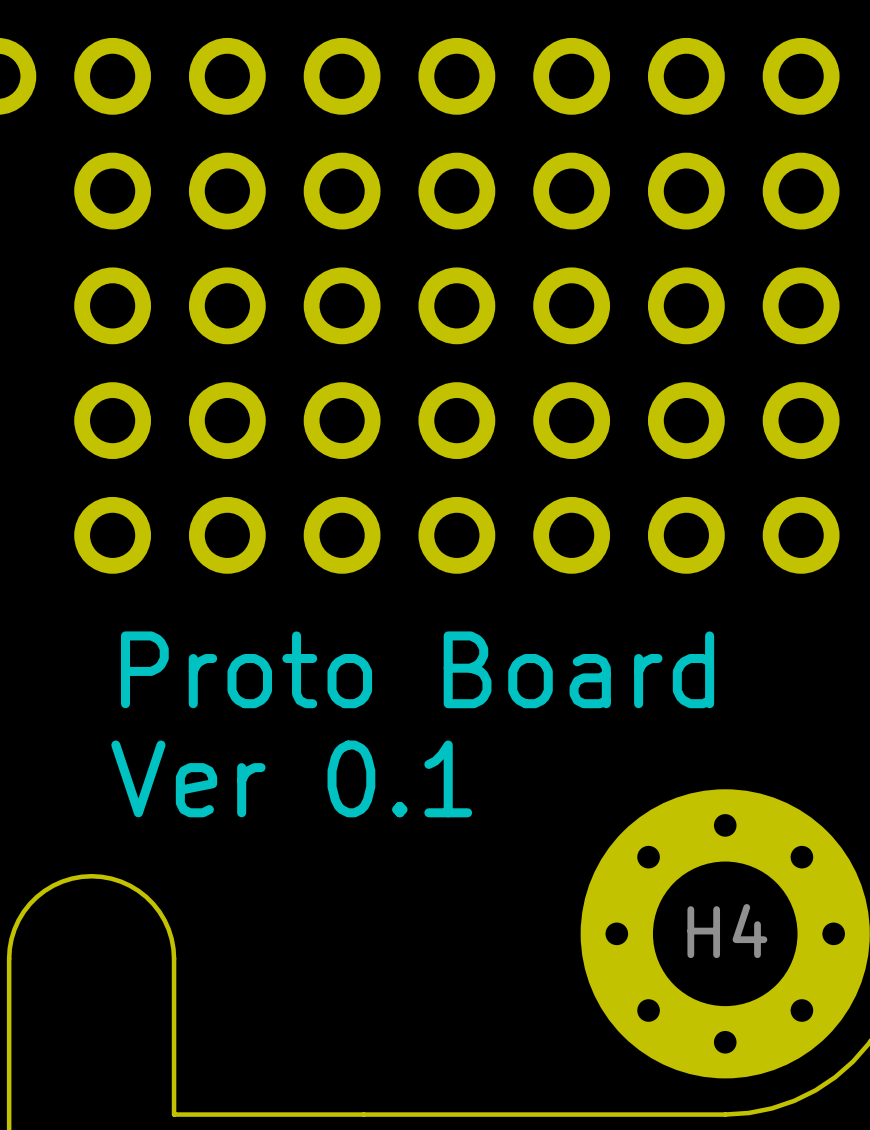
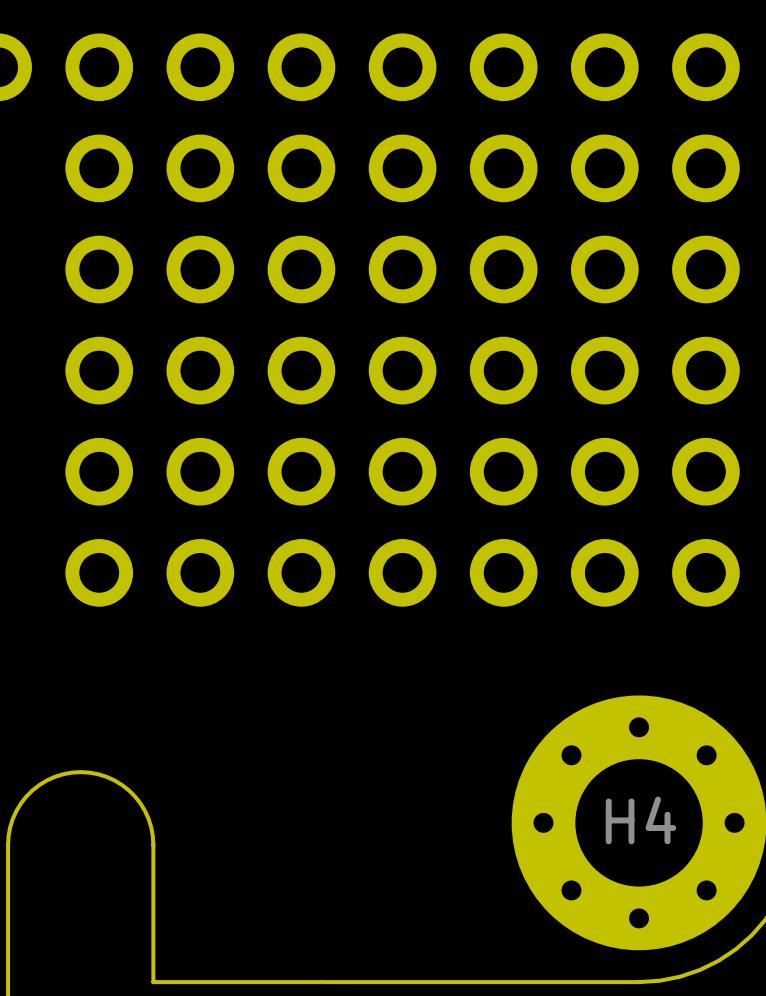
part: none -> (99, 572)
part: none -> (200, 572)
part: none -> (301, 572)
part: none -> (402, 572)
part: none -> (503, 572)
part: none -> (604, 572)
part: none -> (705, 572)
text: Proto Board (417, 669) -> none
text: Ver 0.1 (291, 778) -> none

